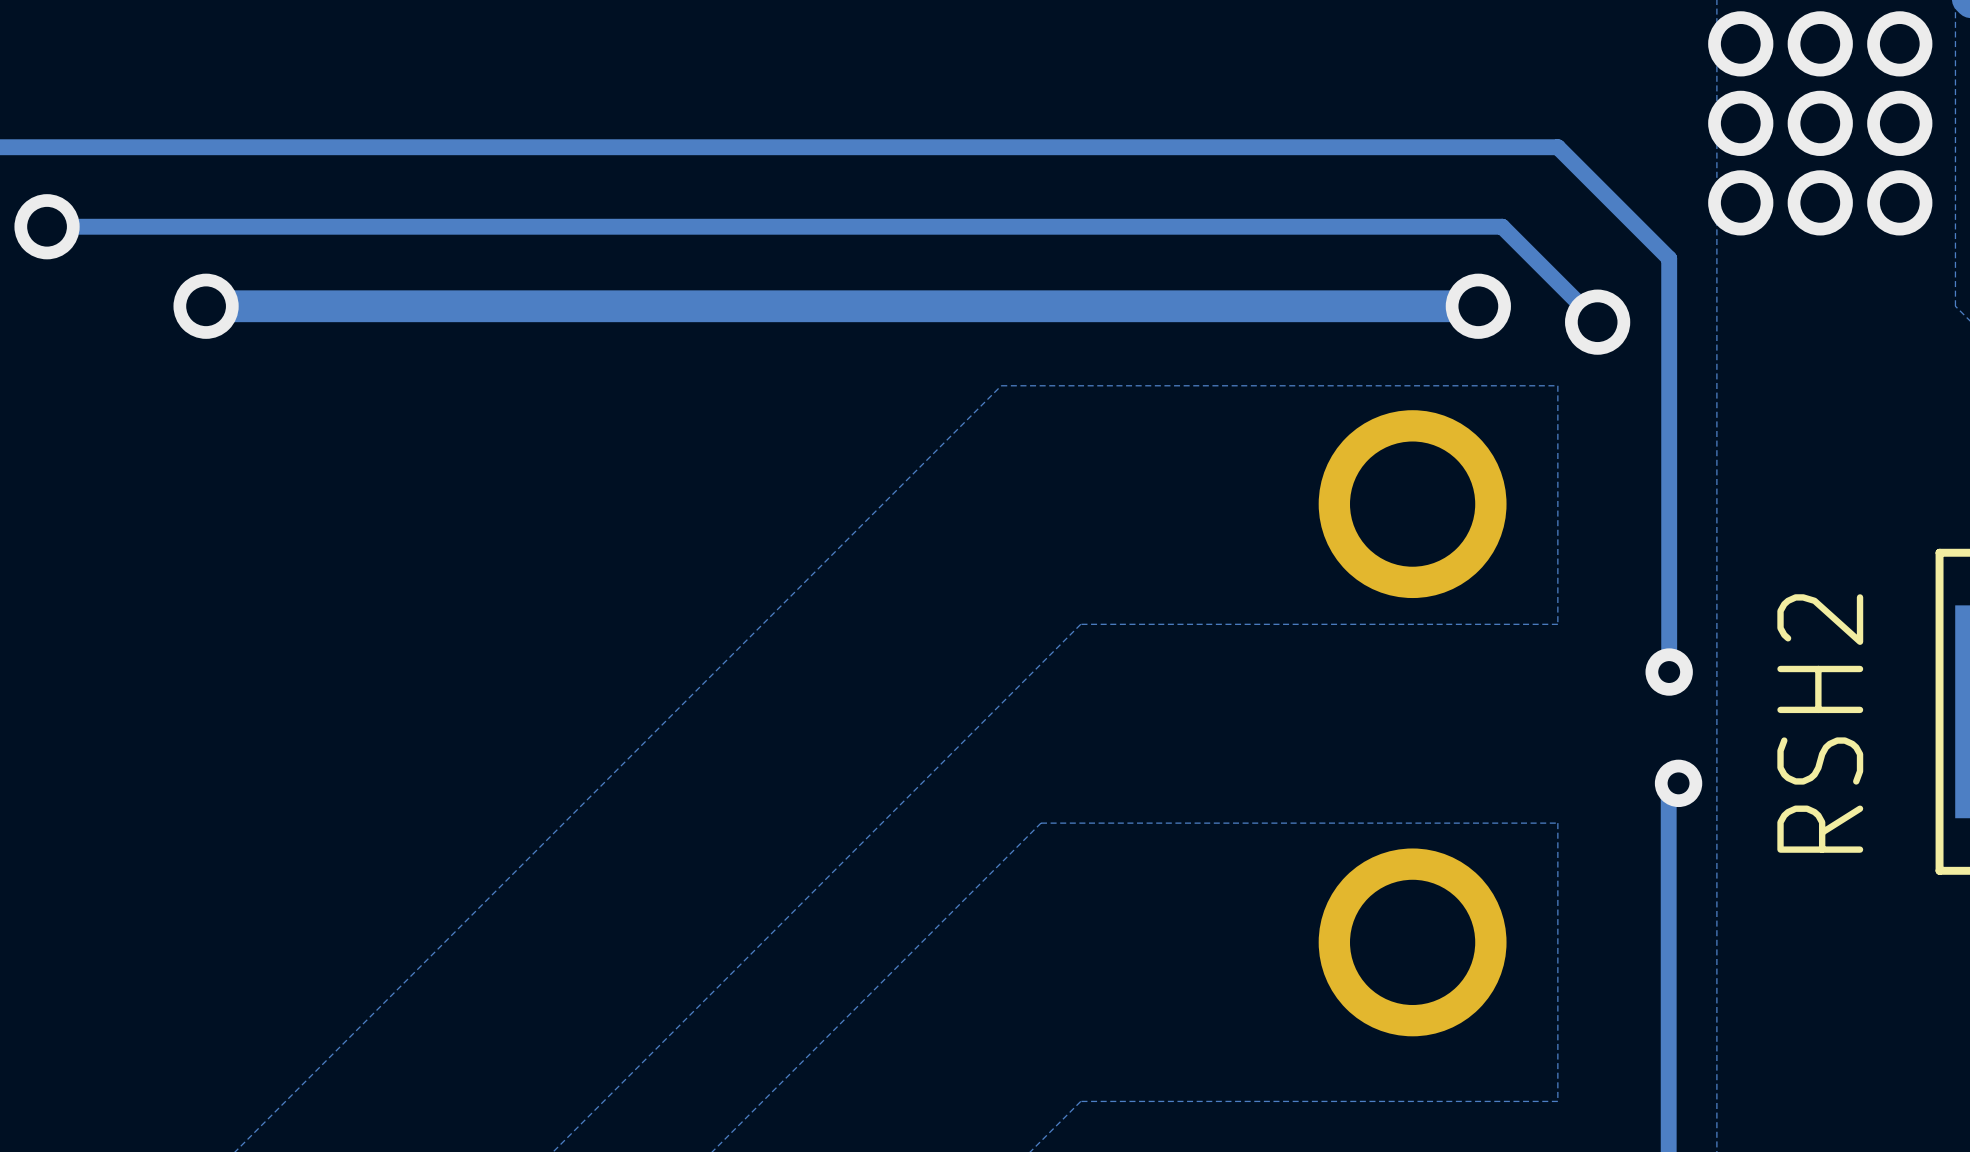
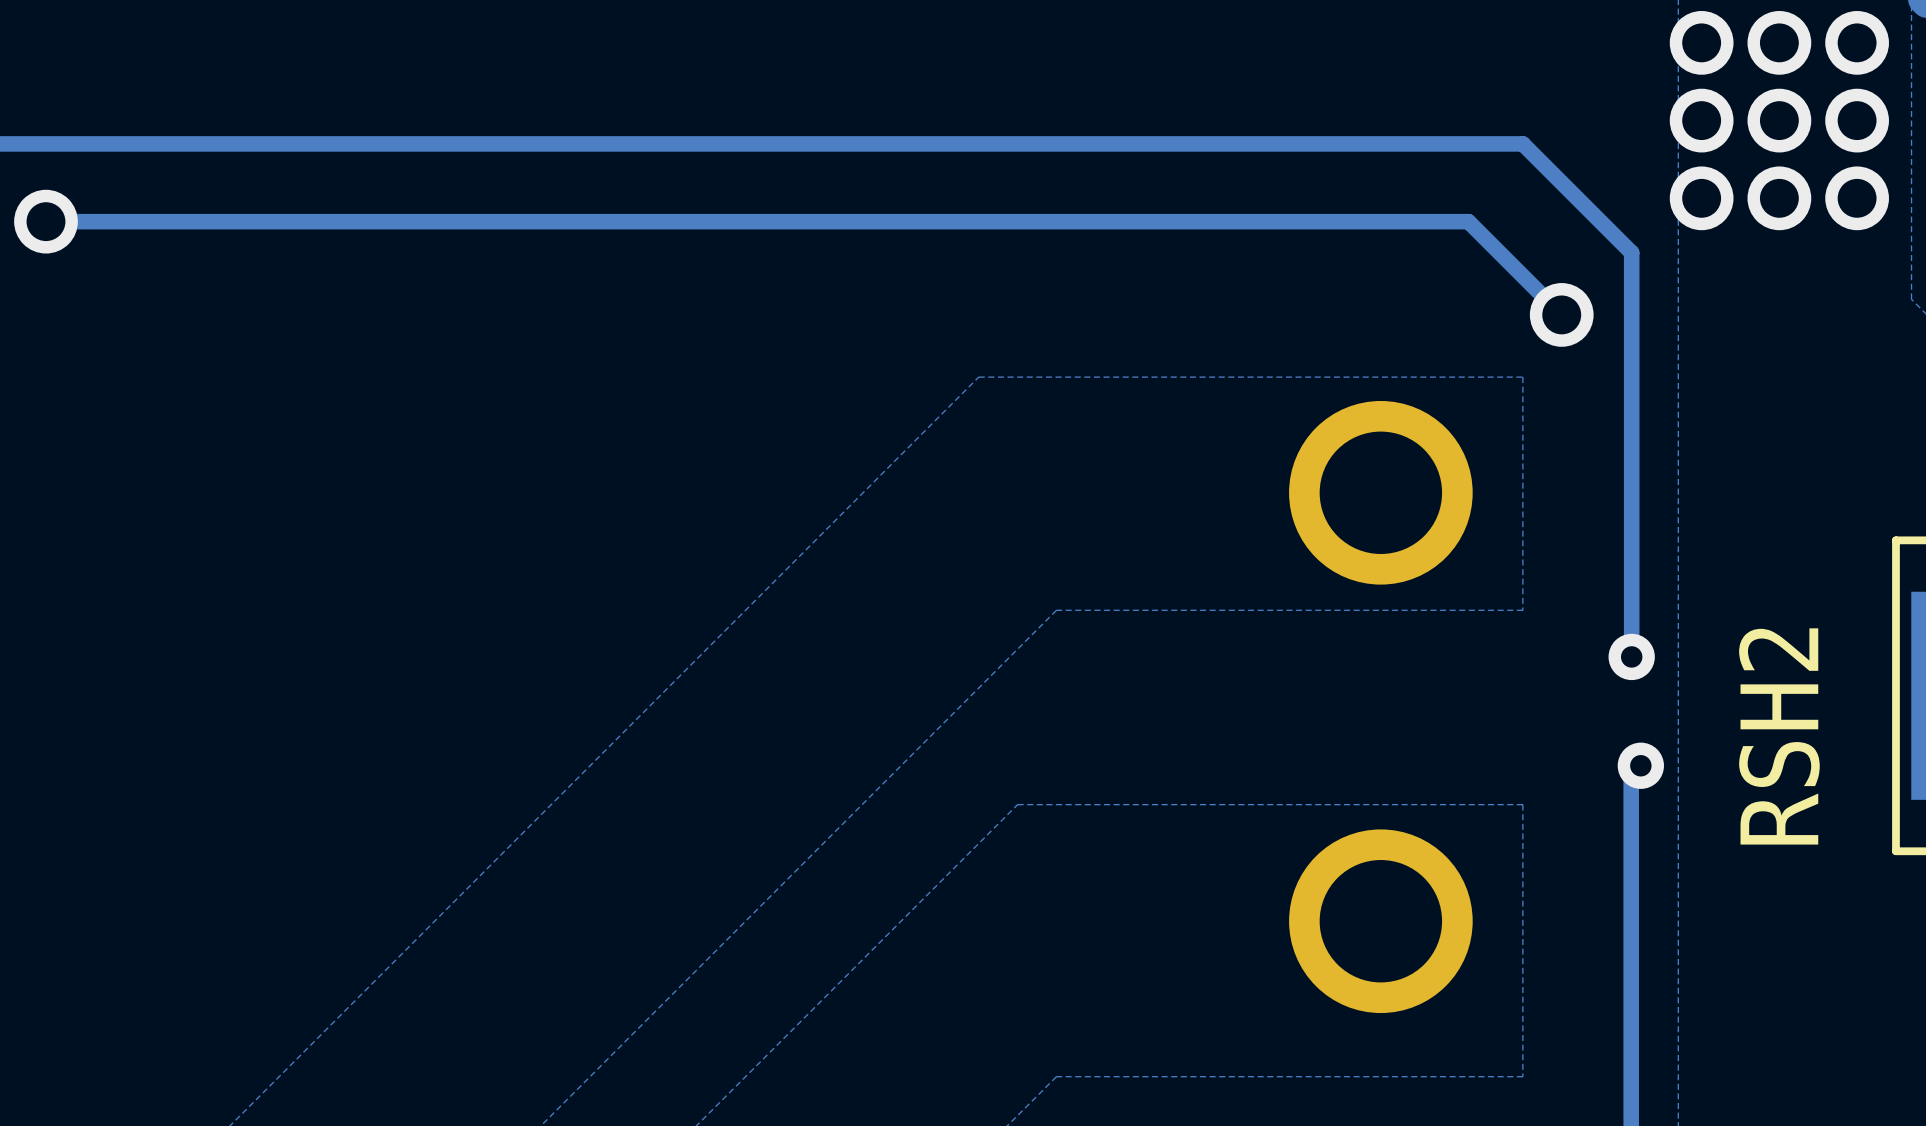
via: (206, 306) -> none
track: (1478, 306) (206, 306) -> none
via: (1478, 306) -> none

